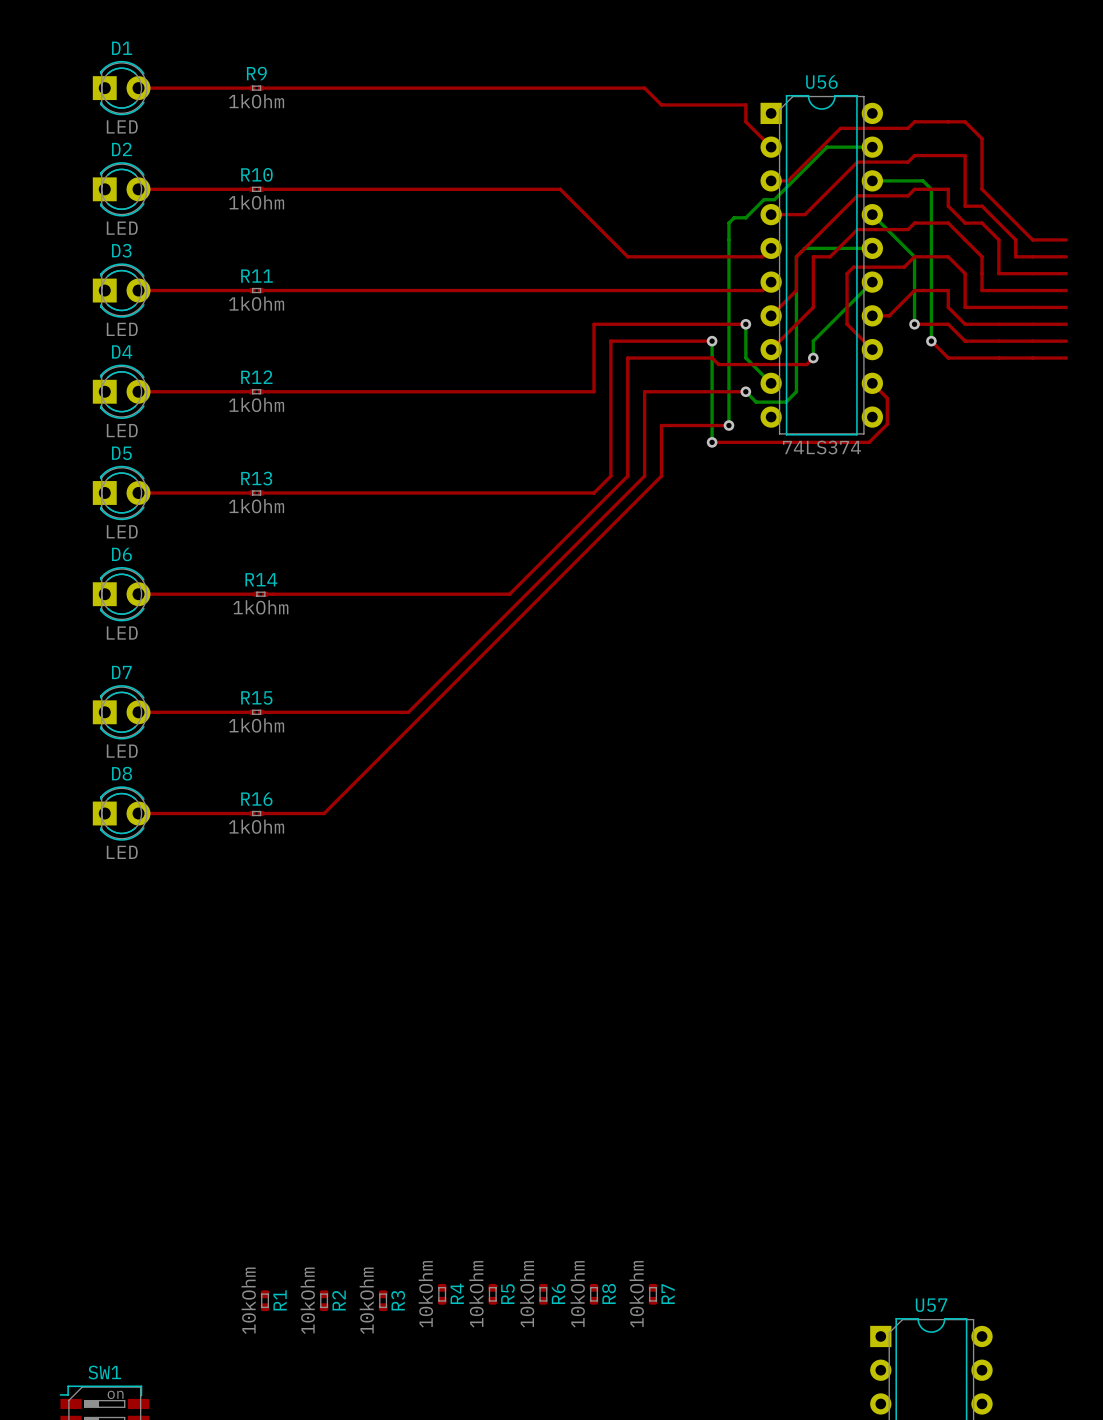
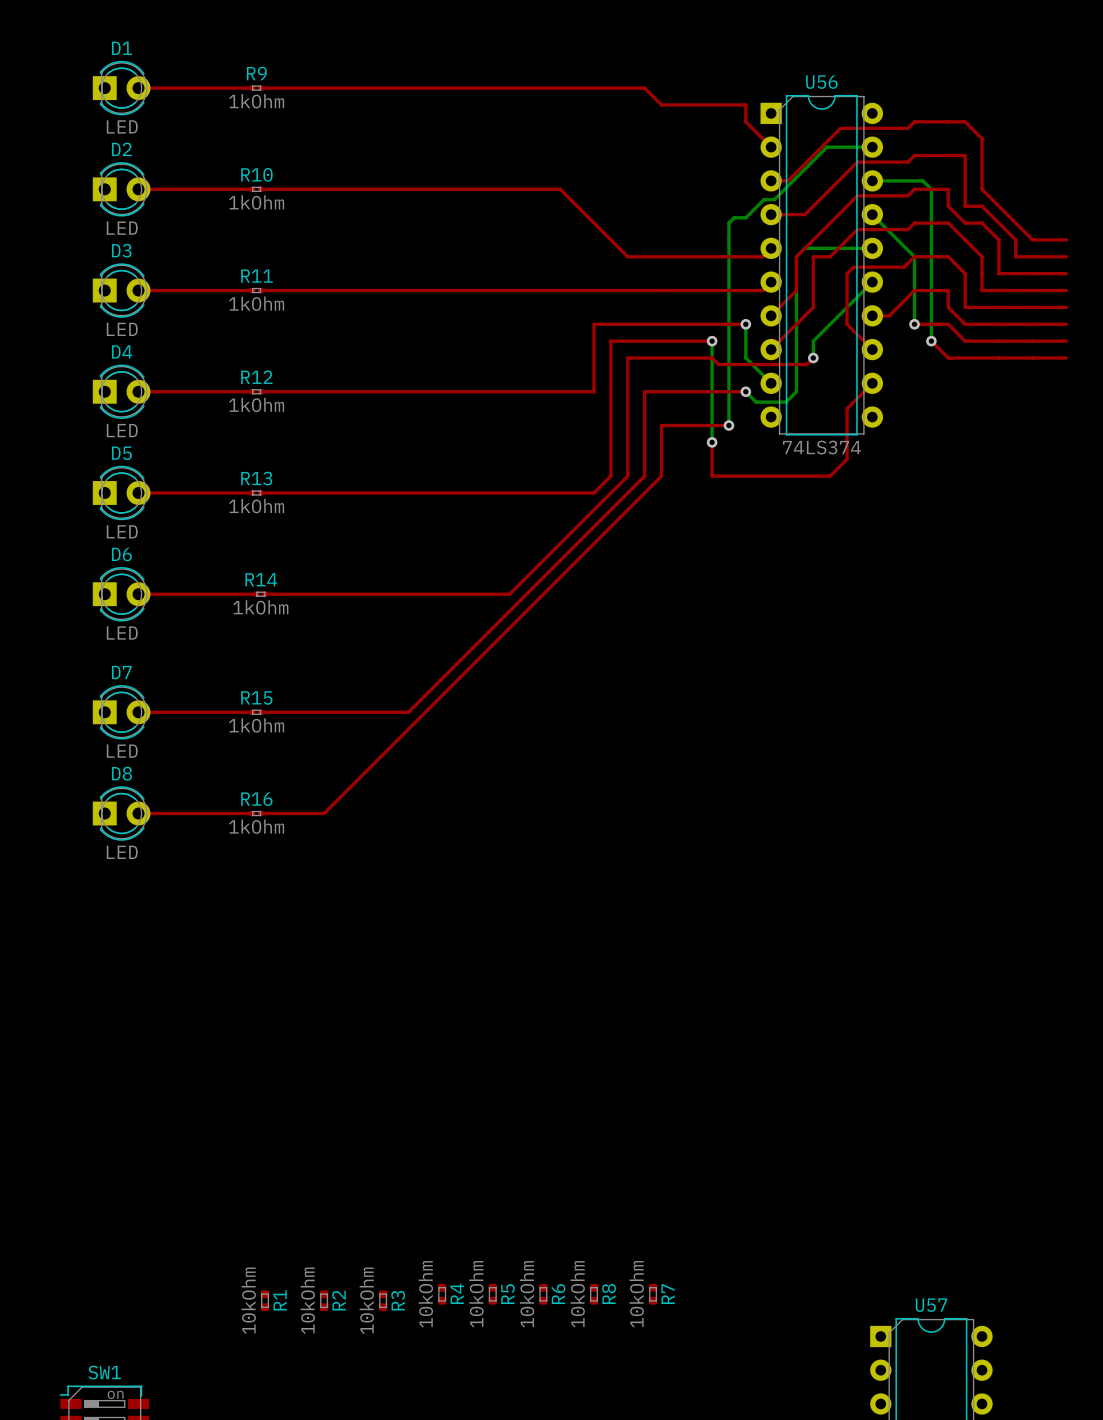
top track: (872, 383) (887, 398) (887, 424) (869, 442) (712, 442) -> (872, 383) (847, 408) (847, 459) (830, 476) (712, 476) (712, 442)

